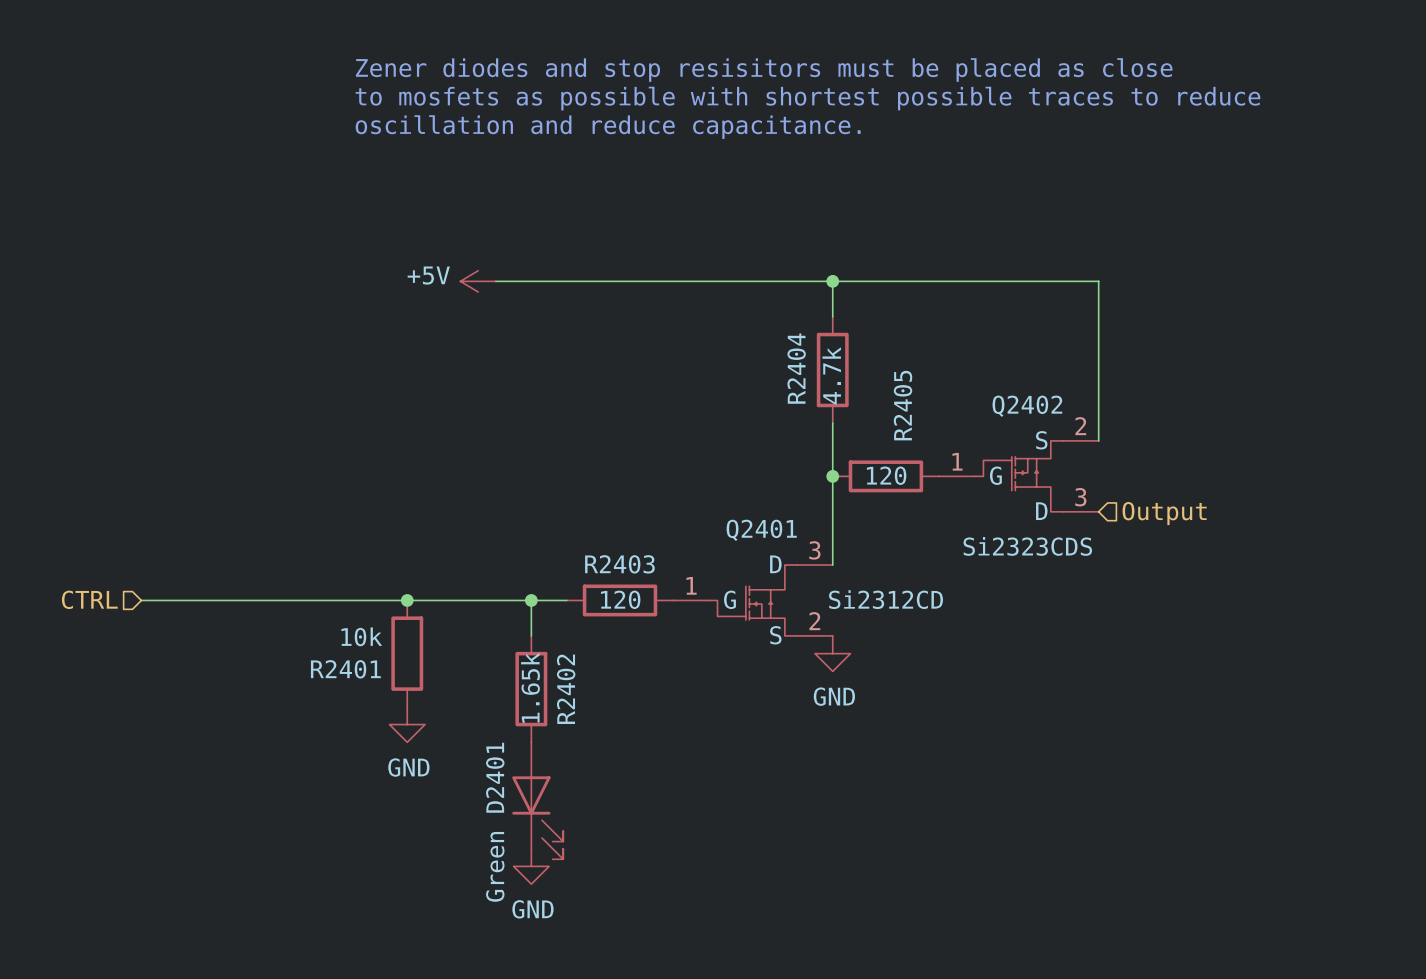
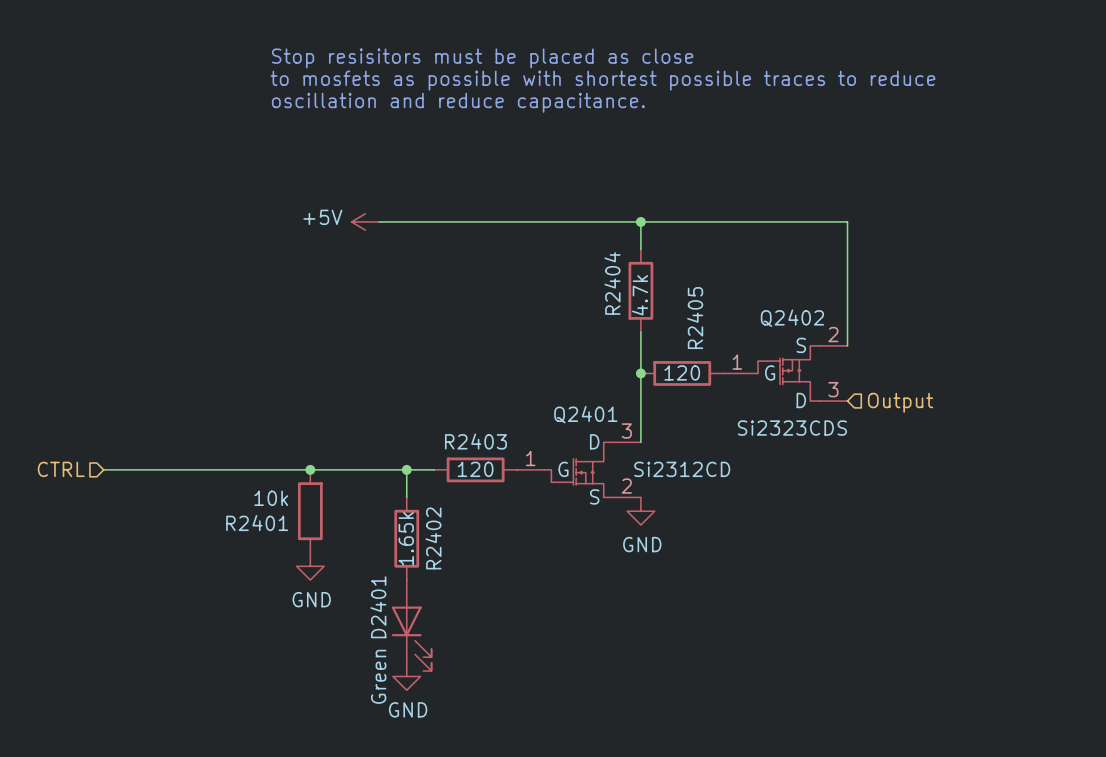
text: Zener diodes and stop resisitors must be placed as close (764, 70) -> Stop resisitors must be placed as close (482, 58)

